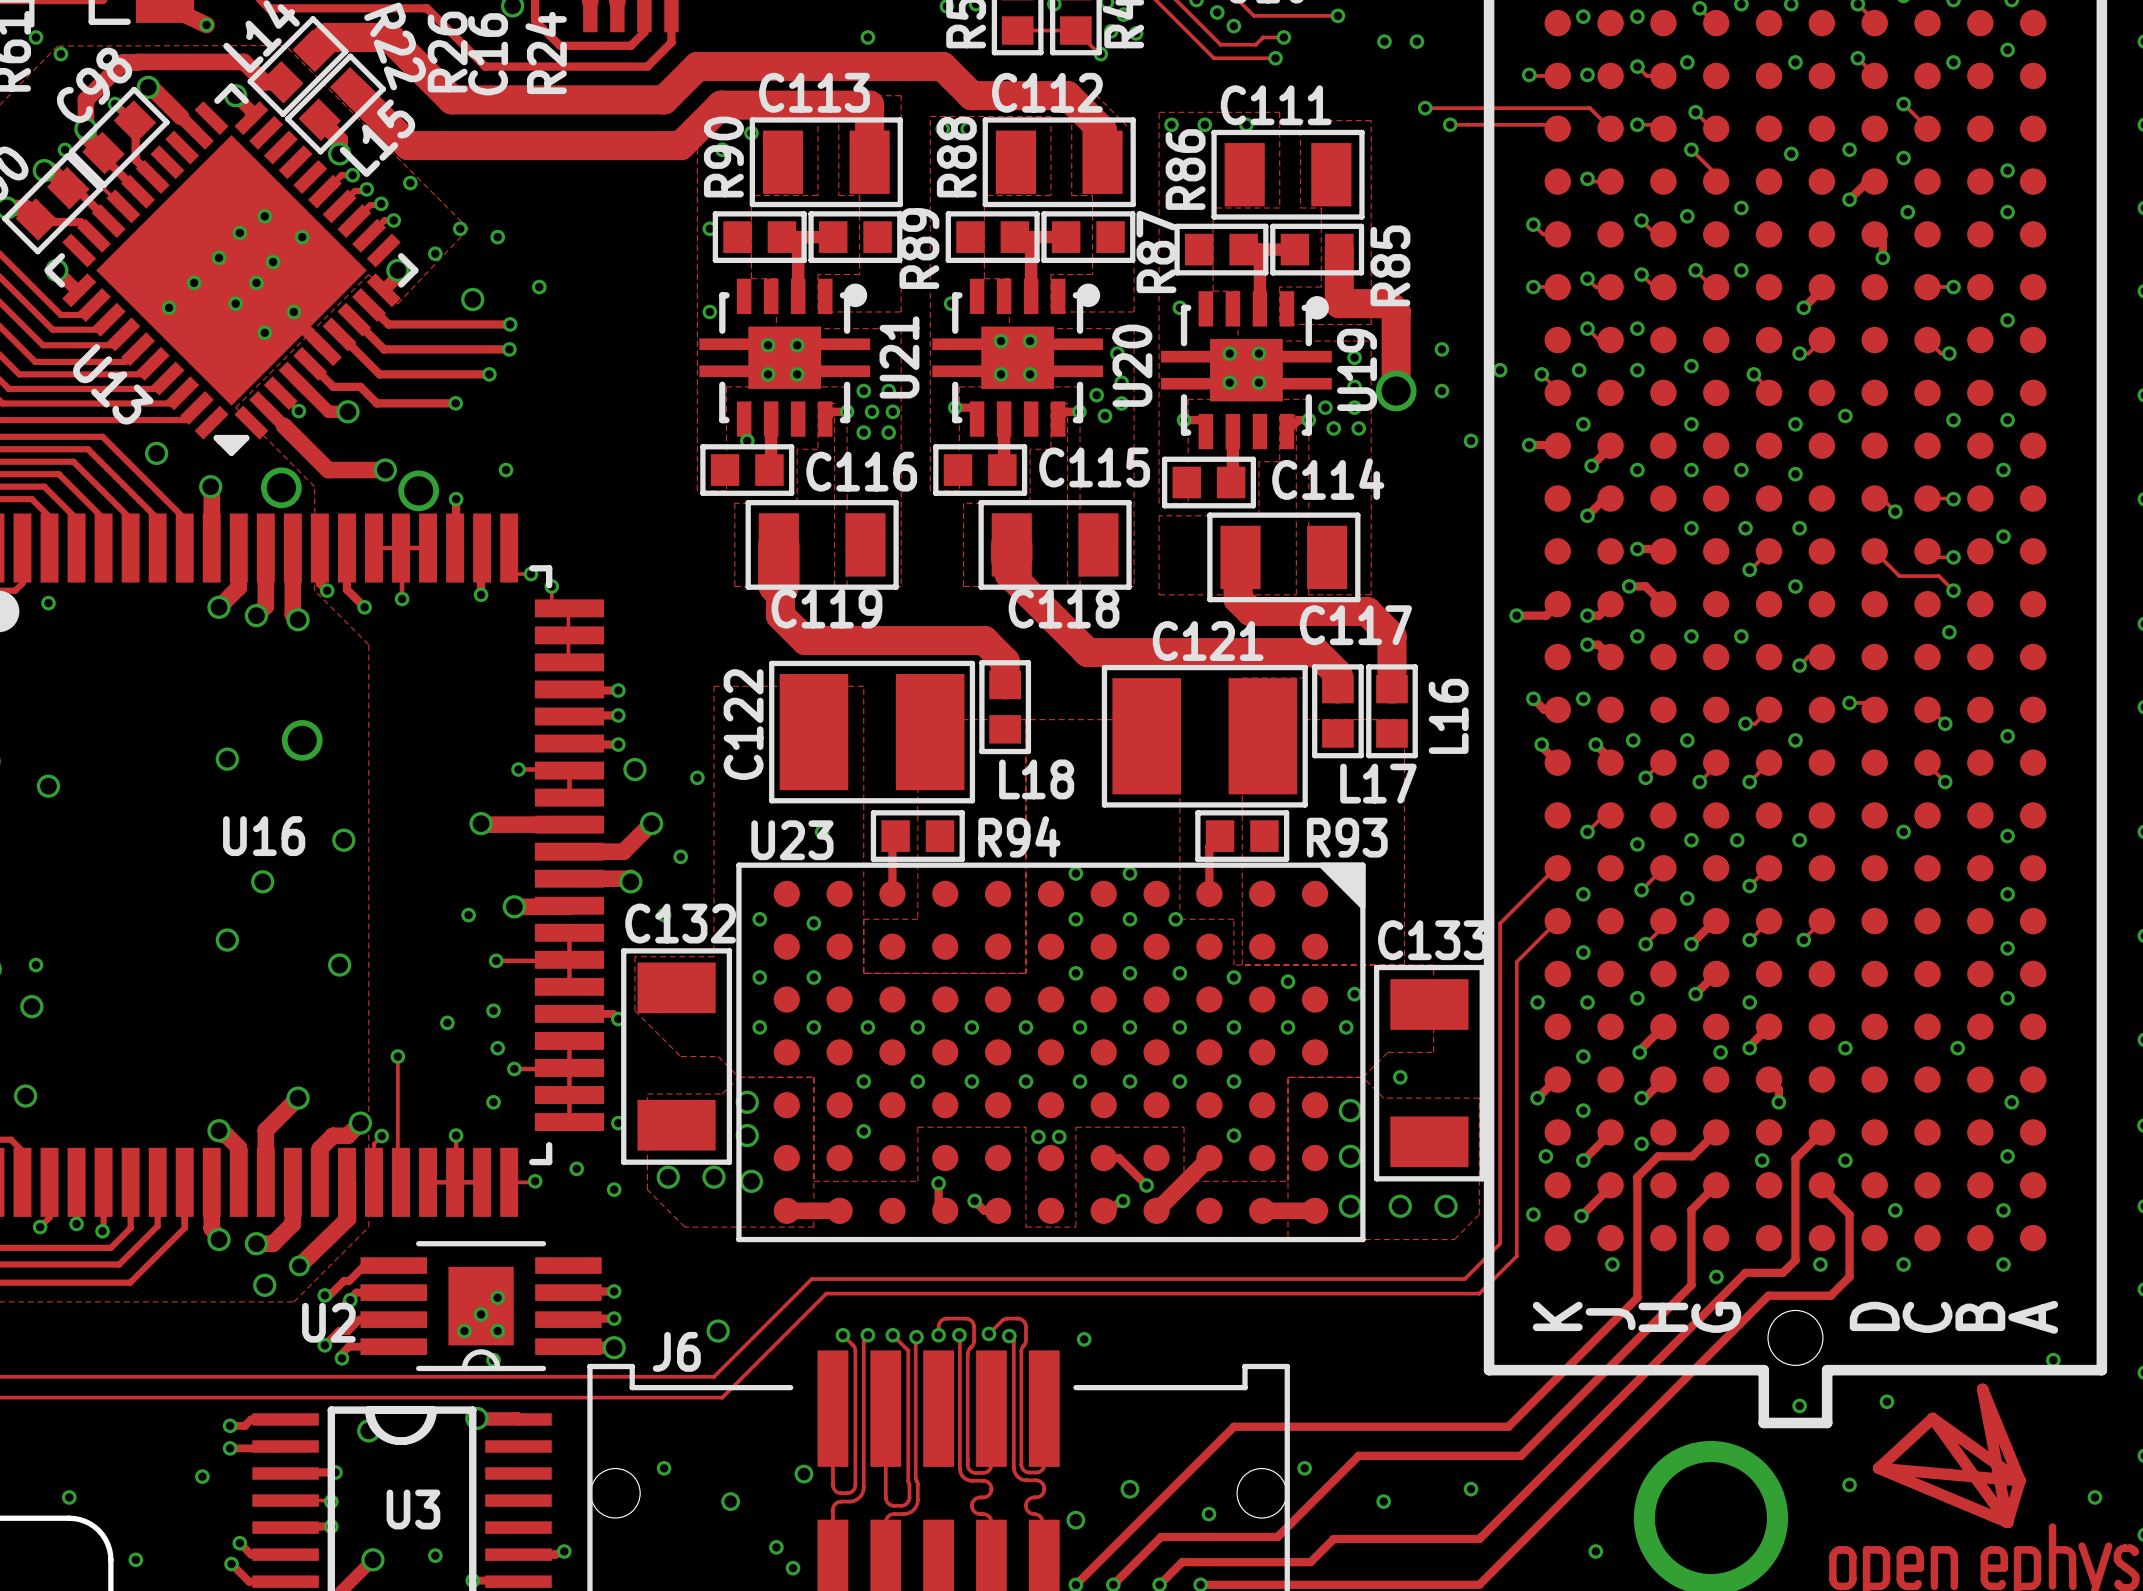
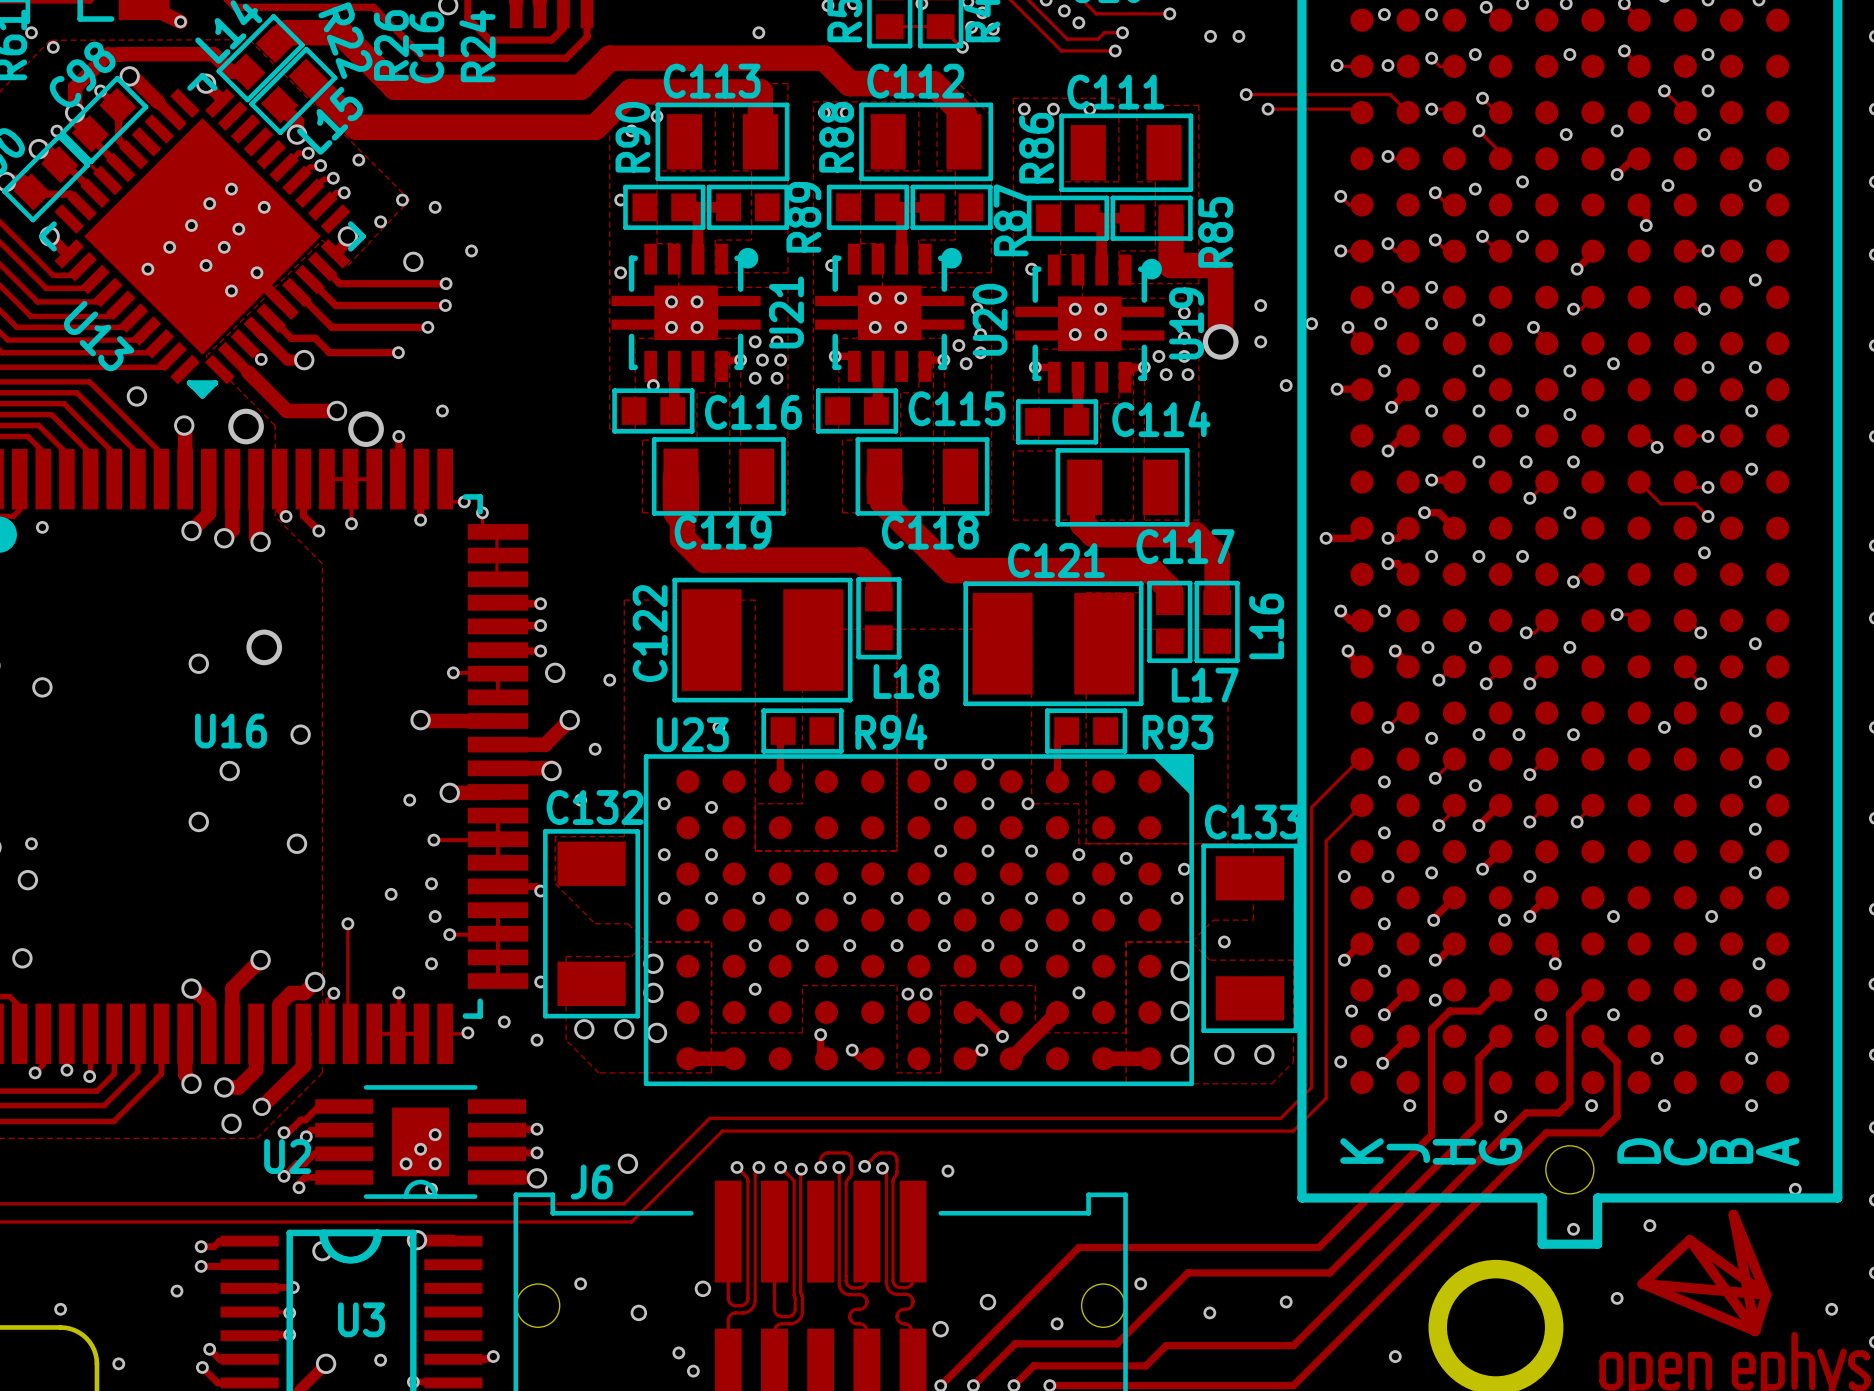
via: (2007, 49) -> none
via: none -> (1708, 90)
via: none -> (1704, 134)
via: (1903, 158) -> none
via: (2007, 170) -> none

